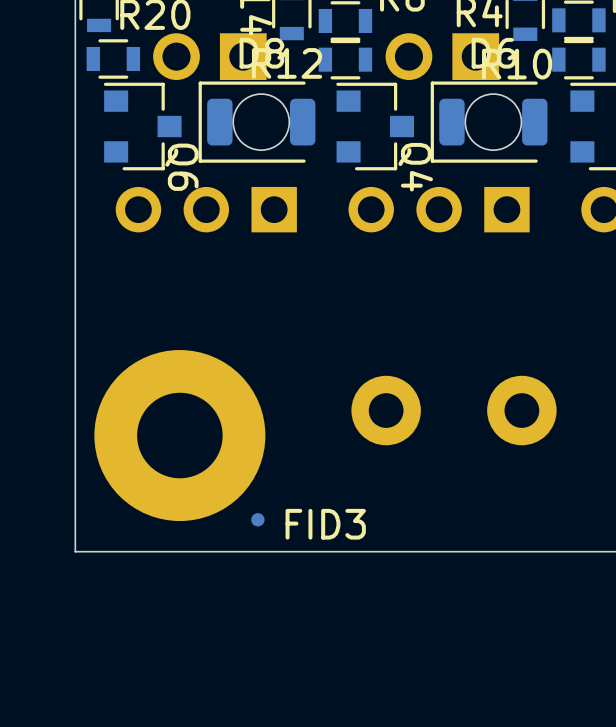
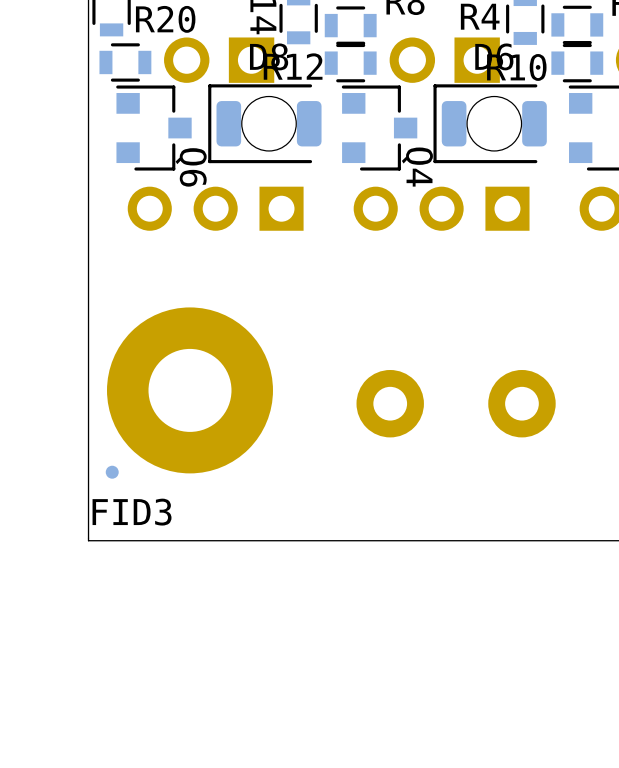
part position: (179, 435) -> (189, 390)
FID3 position: (257, 519) -> (112, 472)
FID3 name position: FID3 (325, 524) -> FID3 (132, 512)

